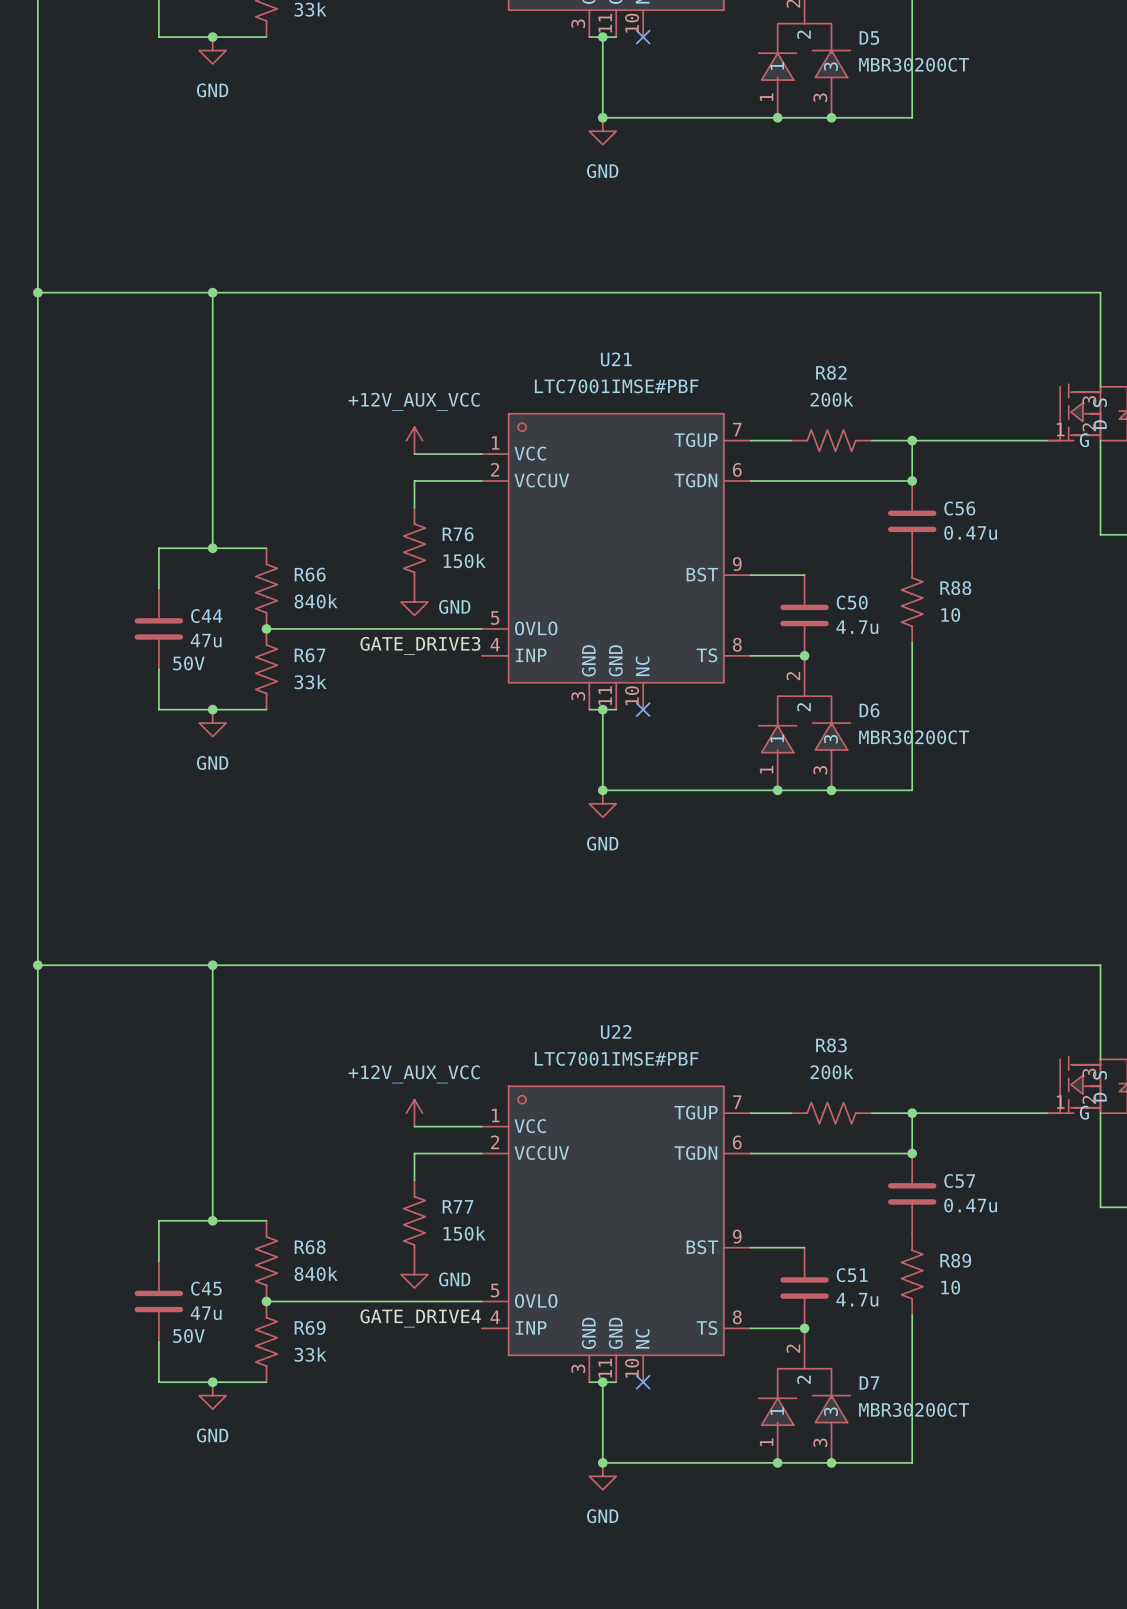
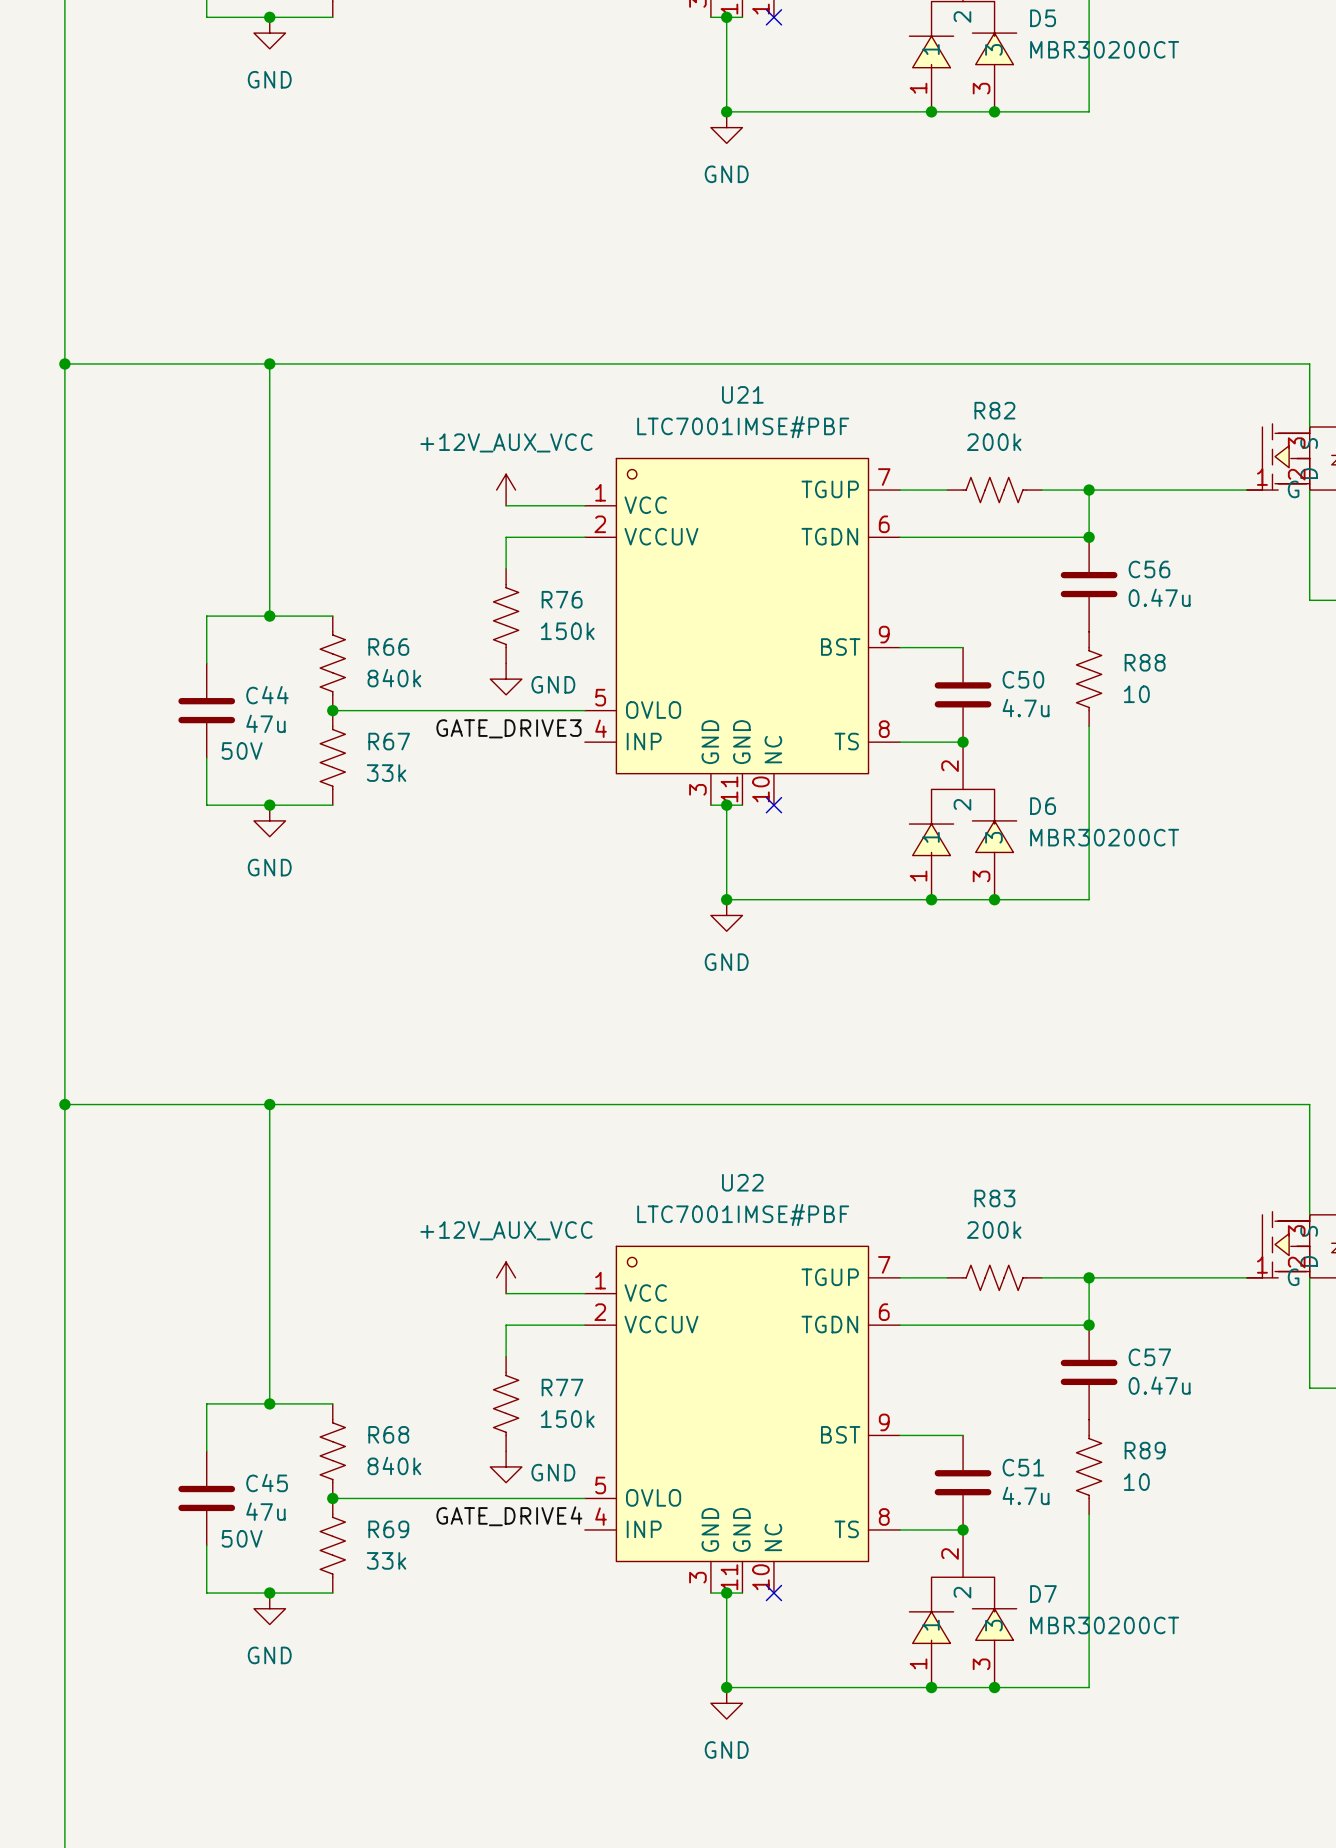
wire: (37, 292) (1100, 292) (1100, 333) -> (64, 363) (1309, 363)
junction position: (37, 292) -> (64, 363)
wire: (212, 292) (212, 333) -> none
junction position: (212, 292) -> (269, 363)

